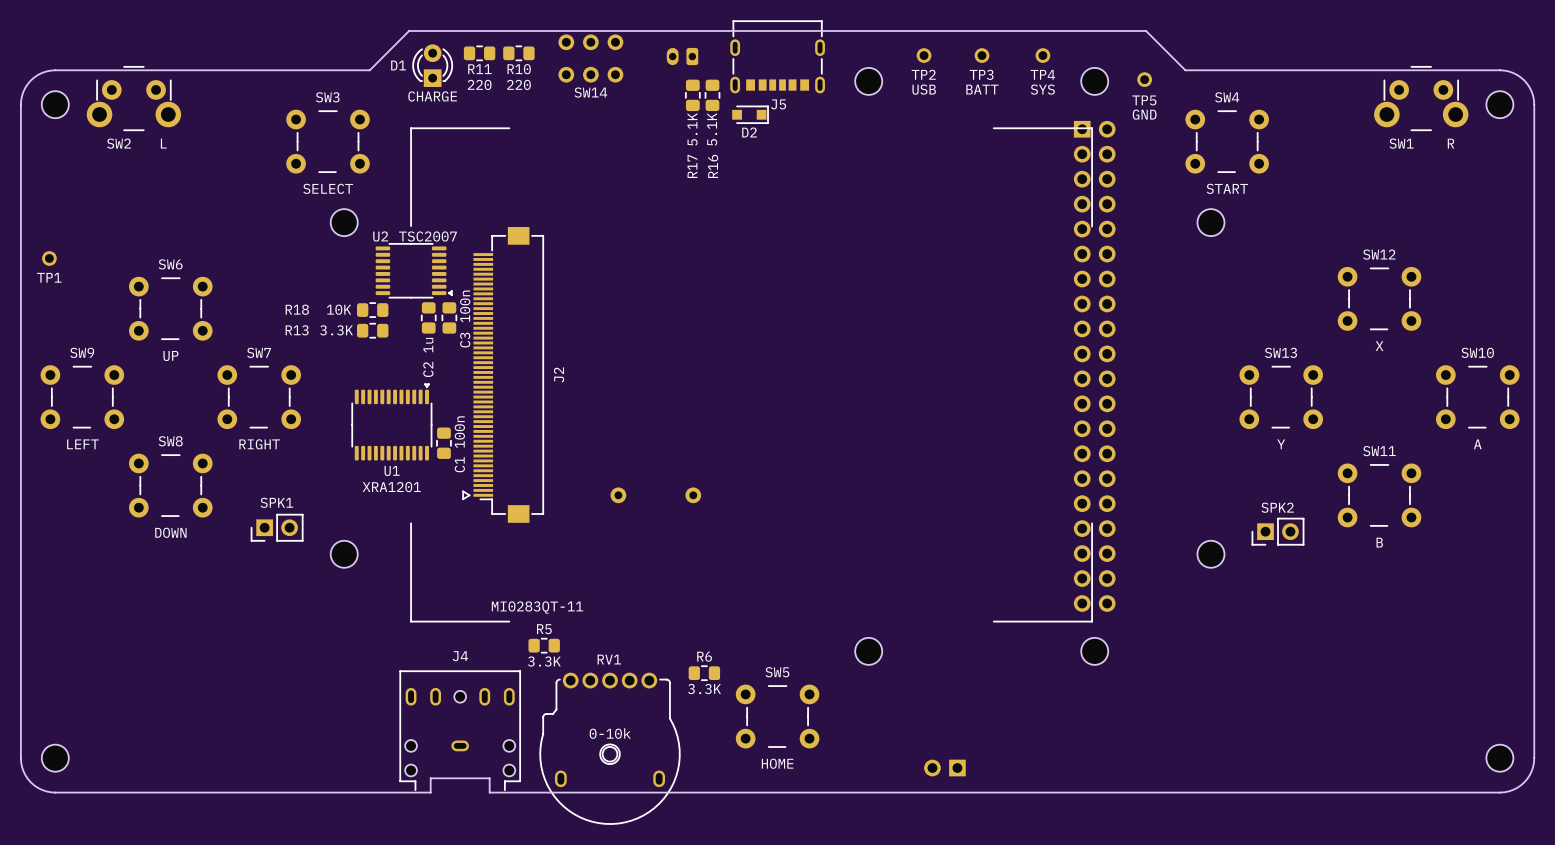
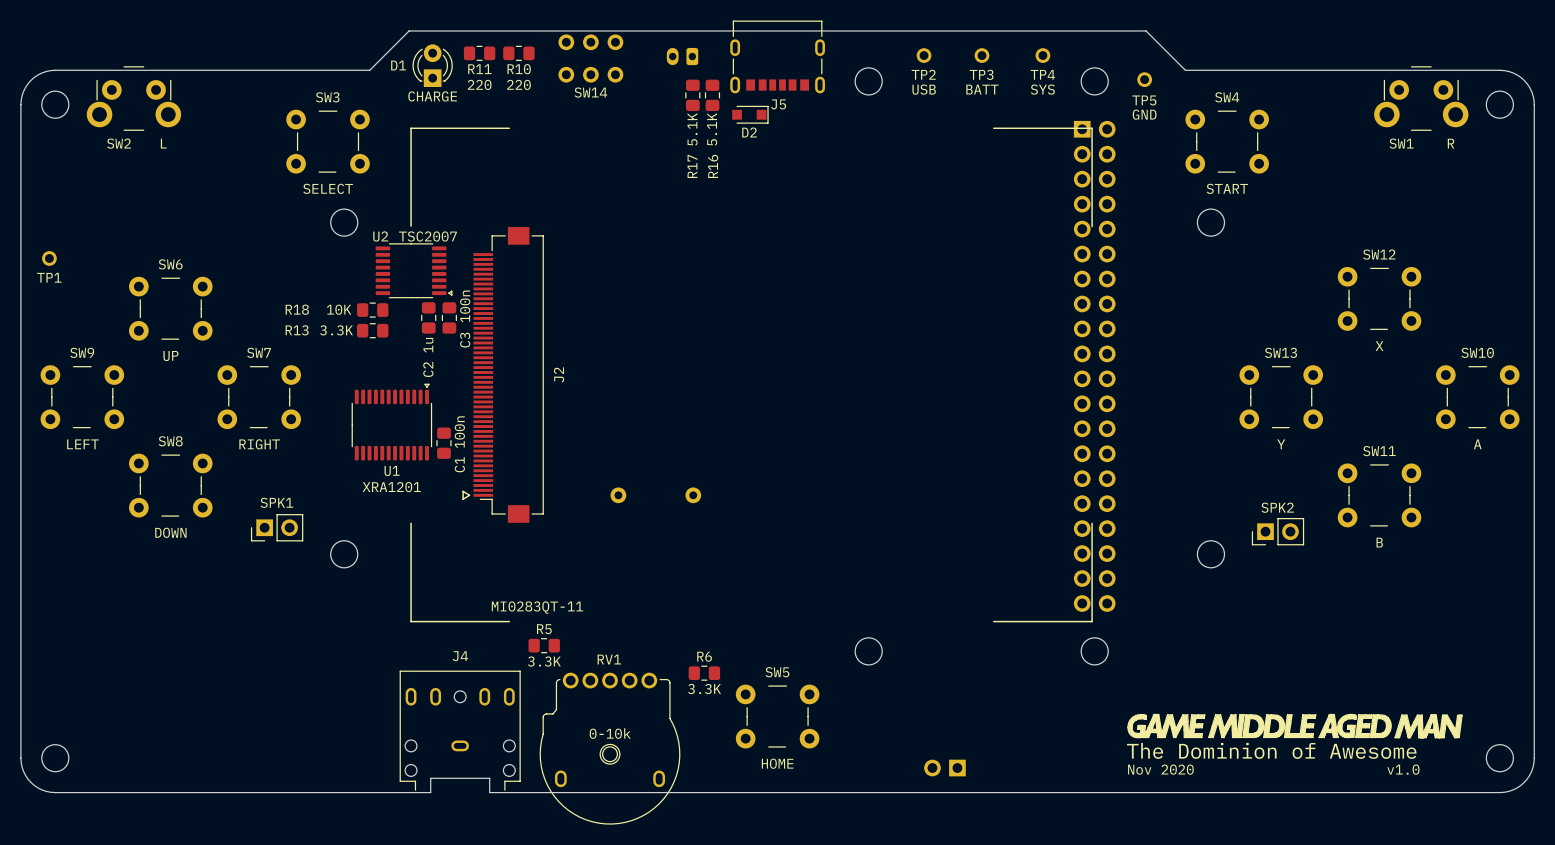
drawing: none -> [1127, 714, 1462, 738]
line: none -> (1142, 714) (1146, 715) (1146, 719) (1135, 720) (1132, 728) (1134, 732) (1140, 733) (1141, 729) (1137, 729) (1138, 725) (1145, 725) (1144, 737) (1133, 736) (1128, 731) (1129, 721) (1134, 716) (1142, 714)
line: none -> (1153, 714) (1158, 714) (1162, 737) (1157, 737) (1157, 732) (1150, 732) (1148, 737) (1143, 737) (1153, 714)
line: none -> (1167, 714) (1160, 737) (1165, 737) (1169, 722) (1173, 737) (1175, 737) (1183, 722) (1184, 737) (1188, 737) (1187, 714) (1182, 714) (1175, 728) (1172, 714) (1167, 714)
line: none -> (1191, 714) (1204, 714) (1204, 718) (1195, 718) (1194, 723) (1202, 723) (1202, 727) (1194, 727) (1193, 733) (1202, 733) (1201, 737) (1188, 737) (1191, 714)
line: none -> (1215, 714) (1208, 737) (1213, 737) (1217, 722) (1221, 737) (1223, 737) (1231, 722) (1232, 737) (1236, 737) (1235, 714) (1231, 714) (1224, 728) (1220, 714) (1215, 714)
line: none -> (1239, 714) (1244, 714) (1241, 737) (1236, 737) (1239, 714)
line: none -> (1245, 714) (1243, 737) (1258, 736) (1263, 729) (1262, 720) (1257, 715) (1245, 714)
line: none -> (1266, 714) (1277, 715) (1283, 720) (1284, 729) (1278, 736) (1263, 737) (1266, 714)
line: none -> (1287, 714) (1291, 714) (1289, 733) (1299, 733) (1298, 737) (1284, 737) (1287, 714)
line: none -> (1302, 714) (1315, 714) (1315, 718) (1306, 718) (1305, 723) (1313, 723) (1313, 727) (1305, 727) (1304, 733) (1313, 733) (1312, 737) (1299, 737) (1302, 714)
line: none -> (1329, 714) (1327, 719) (1319, 737) (1324, 737) (1326, 732) (1332, 732) (1333, 737) (1338, 737) (1334, 714) (1329, 714)
line: none -> (1352, 714) (1355, 715) (1355, 719) (1345, 720) (1341, 728) (1343, 732) (1350, 733) (1350, 729) (1347, 729) (1348, 725) (1355, 725) (1353, 736) (1343, 736) (1338, 731) (1338, 721) (1344, 716) (1352, 714)
line: none -> (1358, 714) (1371, 714) (1371, 718) (1362, 718) (1361, 723) (1369, 723) (1369, 727) (1361, 727) (1360, 733) (1369, 733) (1368, 737) (1355, 737) (1358, 714)
line: none -> (1373, 714) (1384, 715) (1389, 720) (1390, 729) (1385, 736) (1370, 737) (1373, 714)
line: none -> (1442, 715) (1439, 737) (1443, 737) (1446, 722) (1454, 737) (1459, 737) (1461, 715) (1457, 715) (1455, 729) (1447, 715) (1442, 715)
line: none -> (1249, 718) (1255, 719) (1258, 722) (1258, 728) (1255, 733) (1247, 733) (1249, 718)
line: none -> (1270, 718) (1276, 719) (1279, 722) (1279, 728) (1275, 733) (1268, 733) (1270, 718)
line: none -> (1377, 718) (1382, 719) (1385, 722) (1386, 728) (1382, 733) (1375, 733) (1377, 718)
line: none -> (1155, 719) (1156, 729) (1151, 729) (1154, 721) (1155, 719)
line: none -> (1331, 719) (1330, 721) (1327, 729) (1332, 729) (1331, 719)
line: none -> (1432, 720) (1434, 729) (1429, 729) (1432, 721) (1432, 720)
line: none -> (1420, 737) (1425, 727) (1426, 725) (1428, 720) (1431, 714) (1436, 715) (1439, 737) (1435, 737) (1434, 732) (1427, 732) (1425, 737) (1418, 737) (1417, 722) (1410, 737) (1408, 737) (1404, 722) (1399, 737) (1395, 737) (1401, 715) (1406, 715) (1410, 728) (1417, 715) (1422, 715) (1422, 727) (1422, 731) (1422, 732) (1423, 737)
text: none -> The Dominion of Awesome (1271, 750)
text: none -> Nov 2020 (1160, 769)
text: none -> v1.0 (1403, 769)

